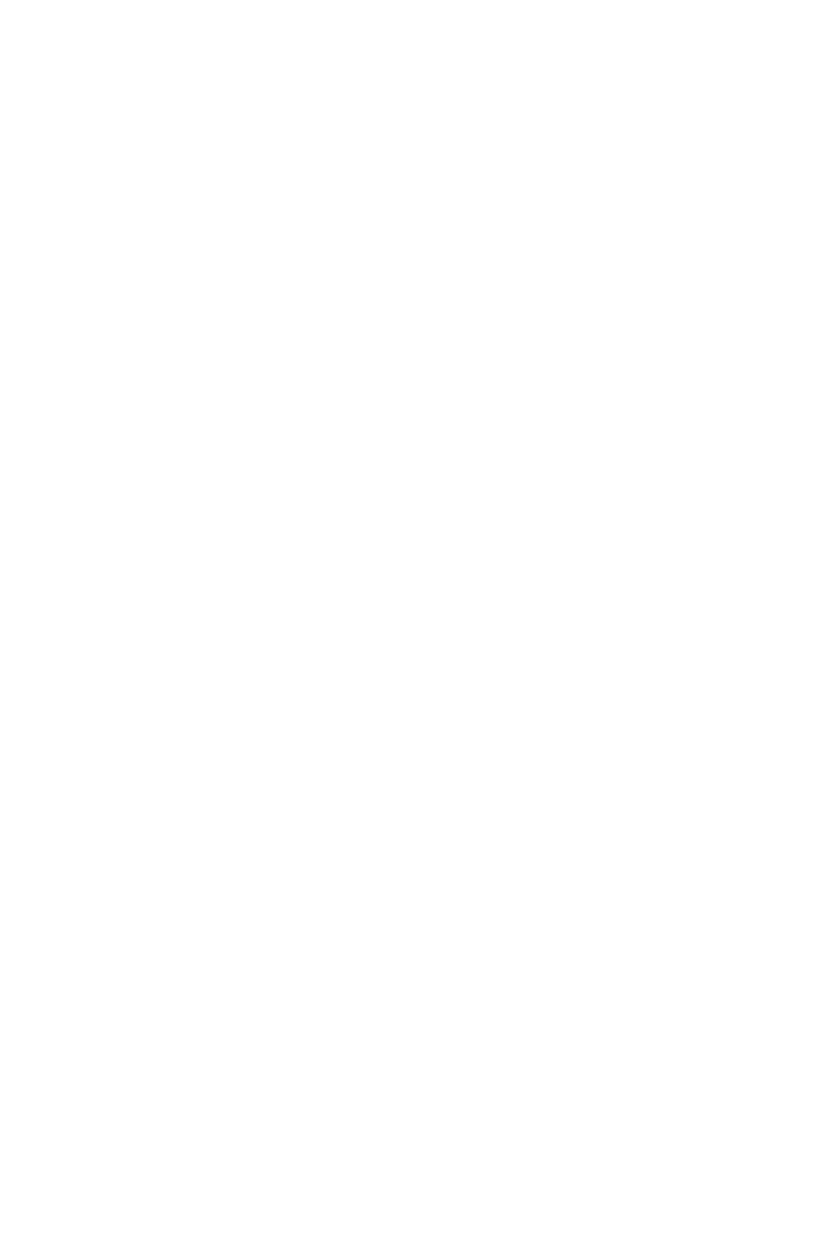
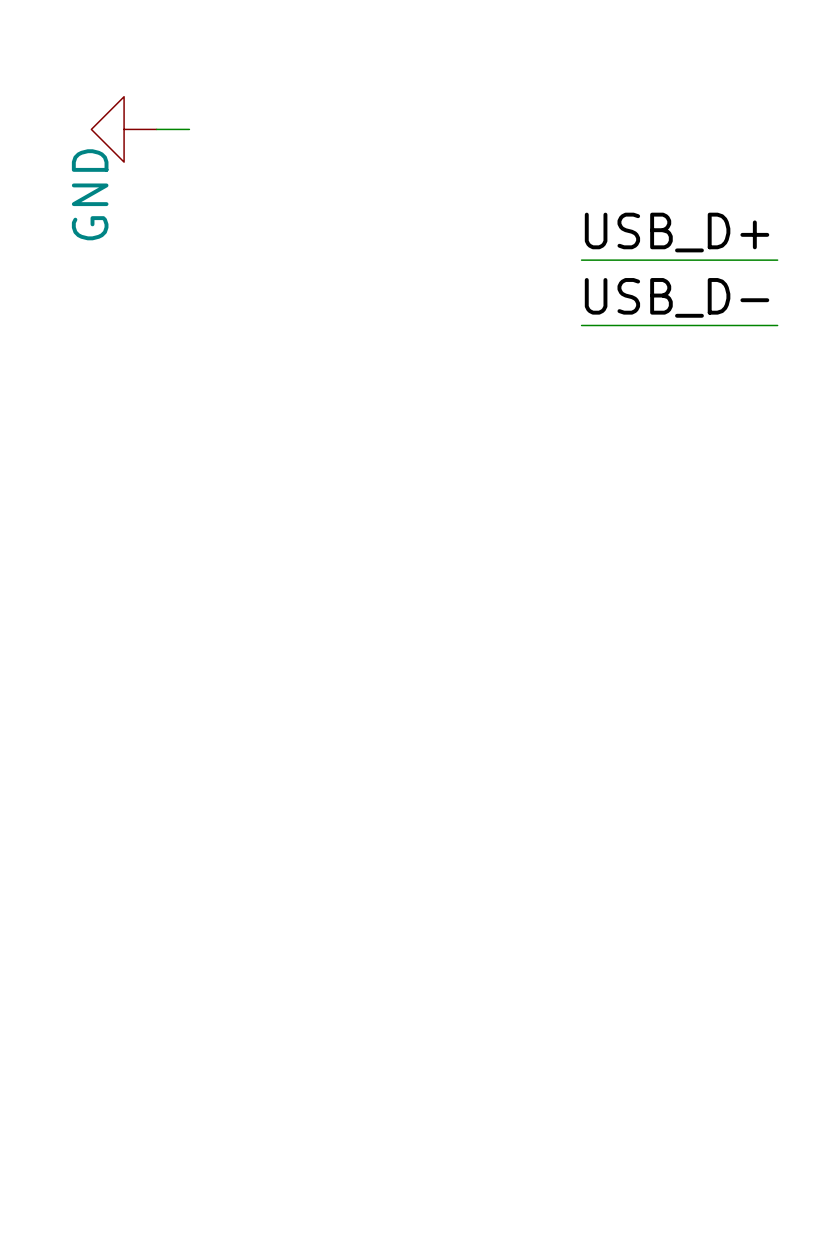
power symbol: none -> GND (124, 129)
wire: none -> (156, 129) (189, 129)
label: none -> USB_D+ (677, 232)
wire: none -> (581, 260) (777, 260)
label: none -> USB_D- (677, 297)
wire: none -> (581, 325) (777, 325)

